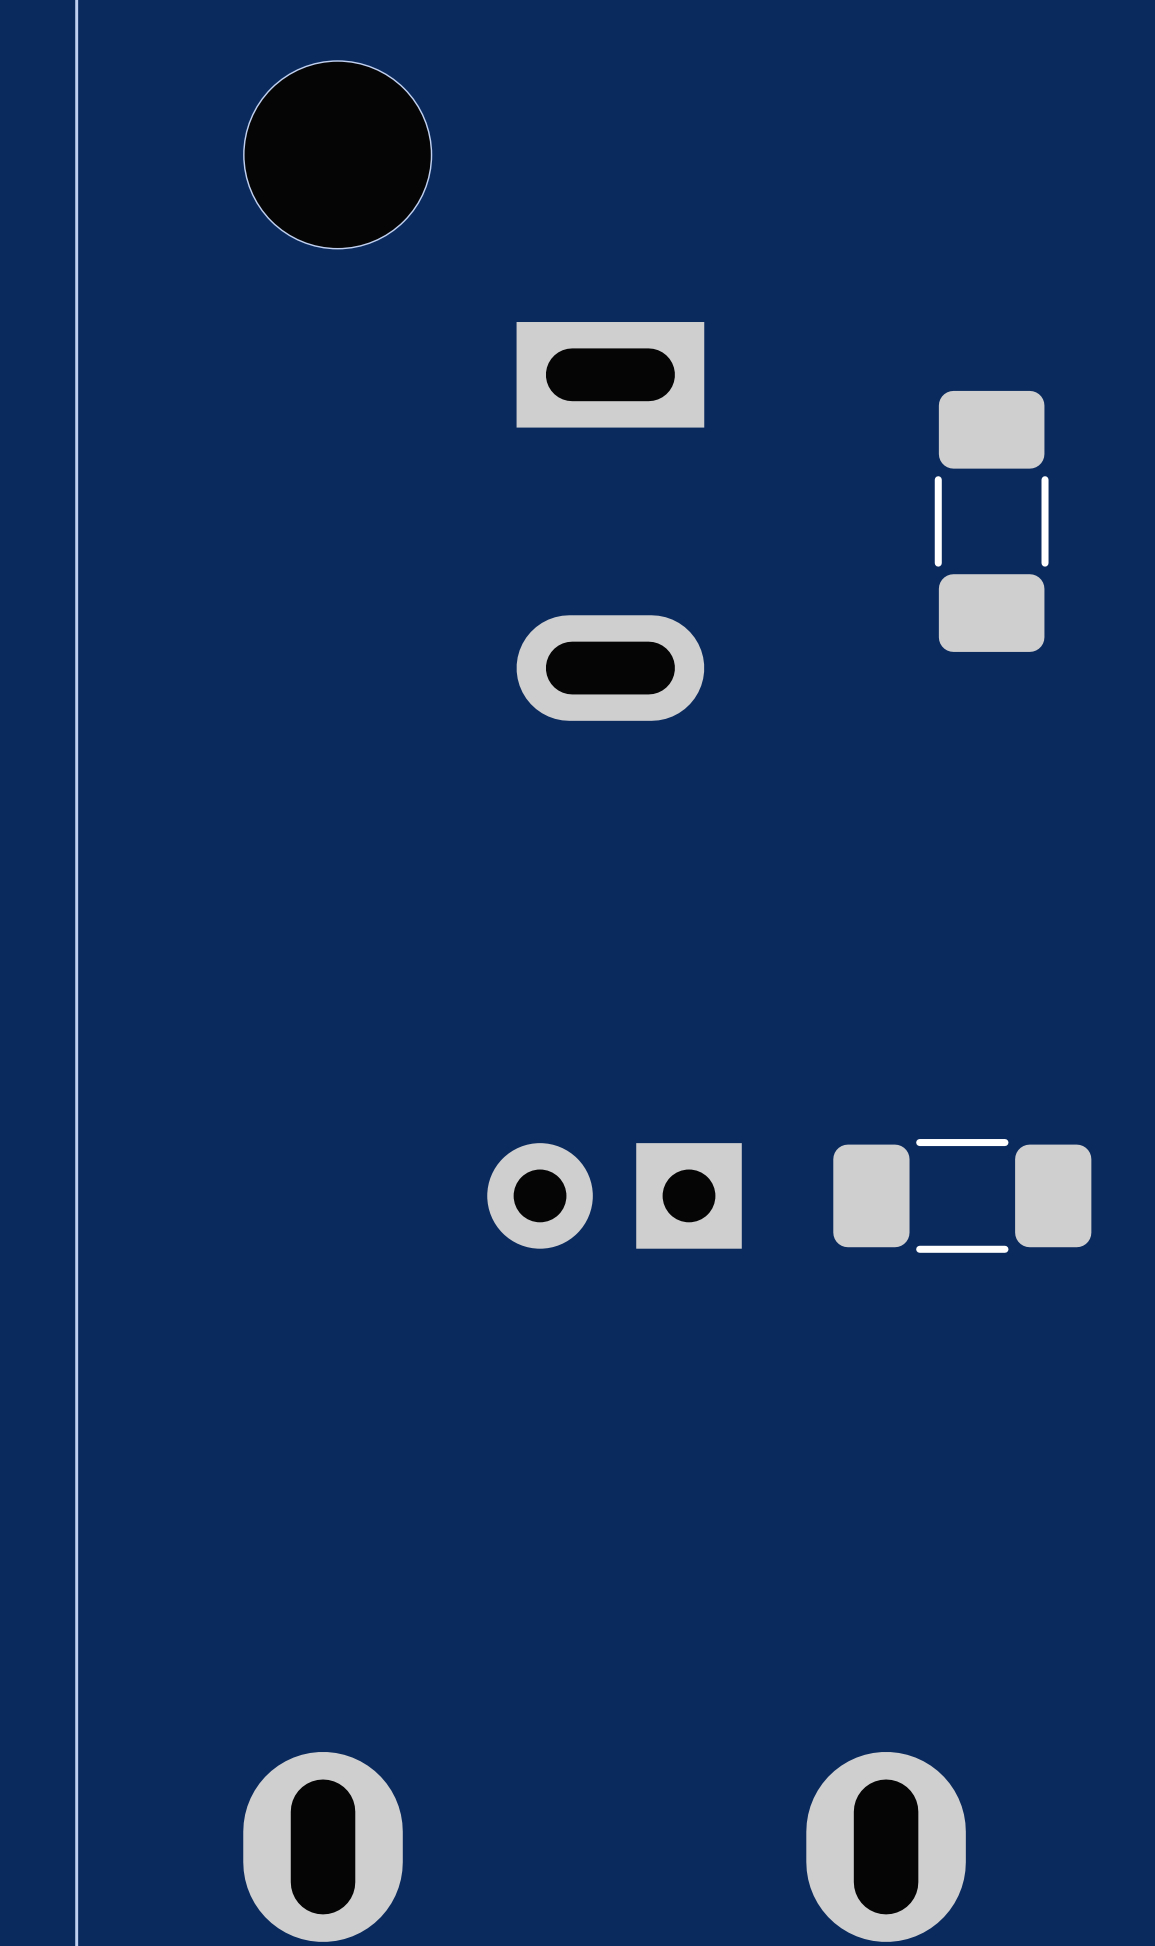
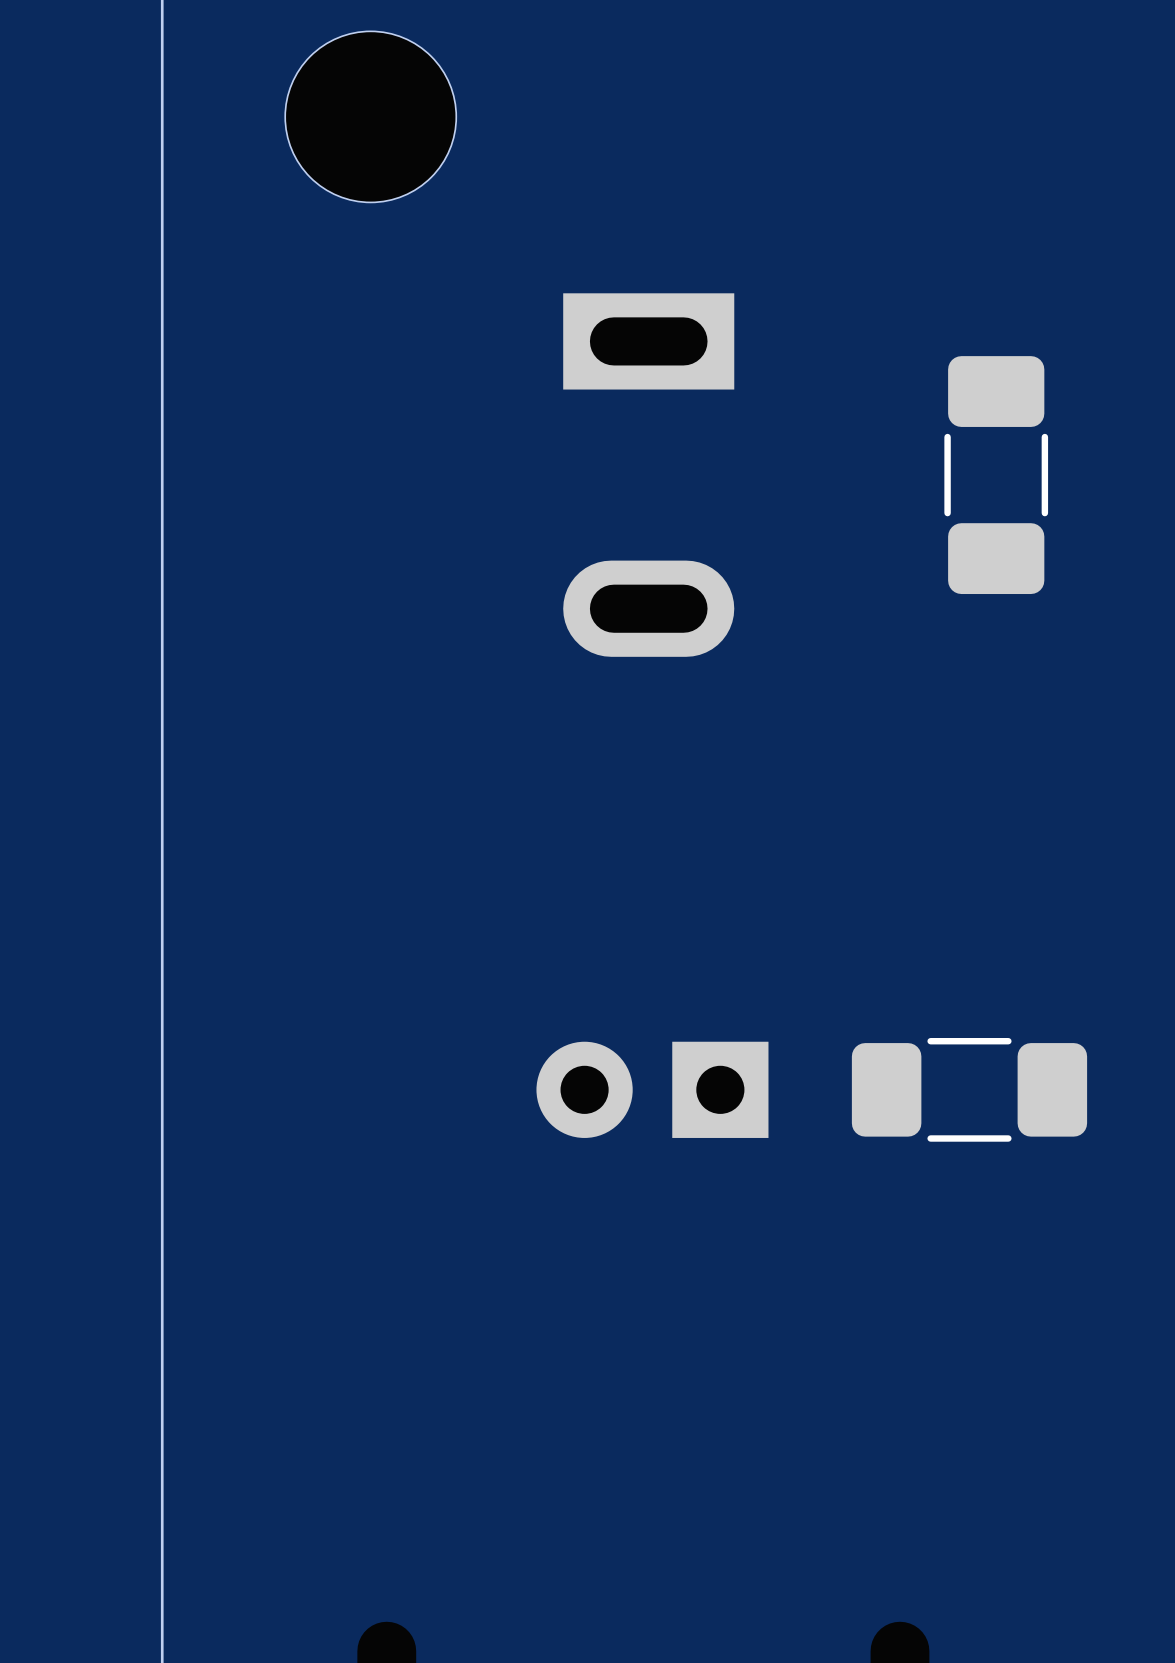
part position: (337, 154) -> (370, 116)

